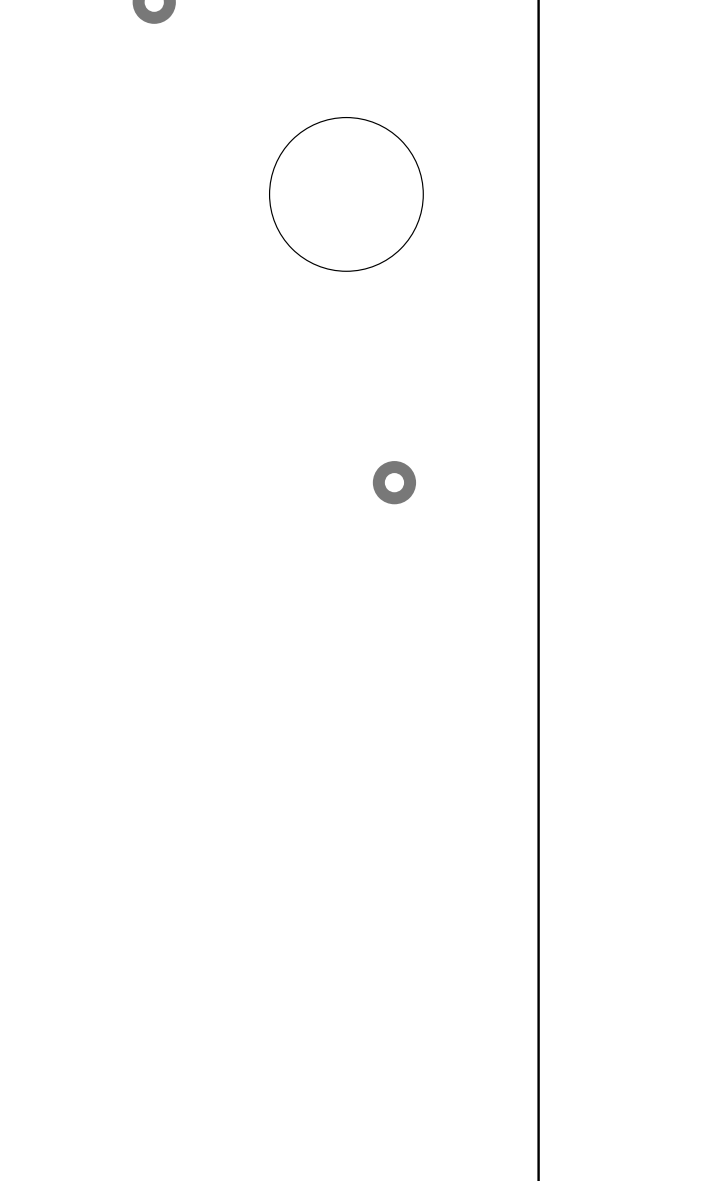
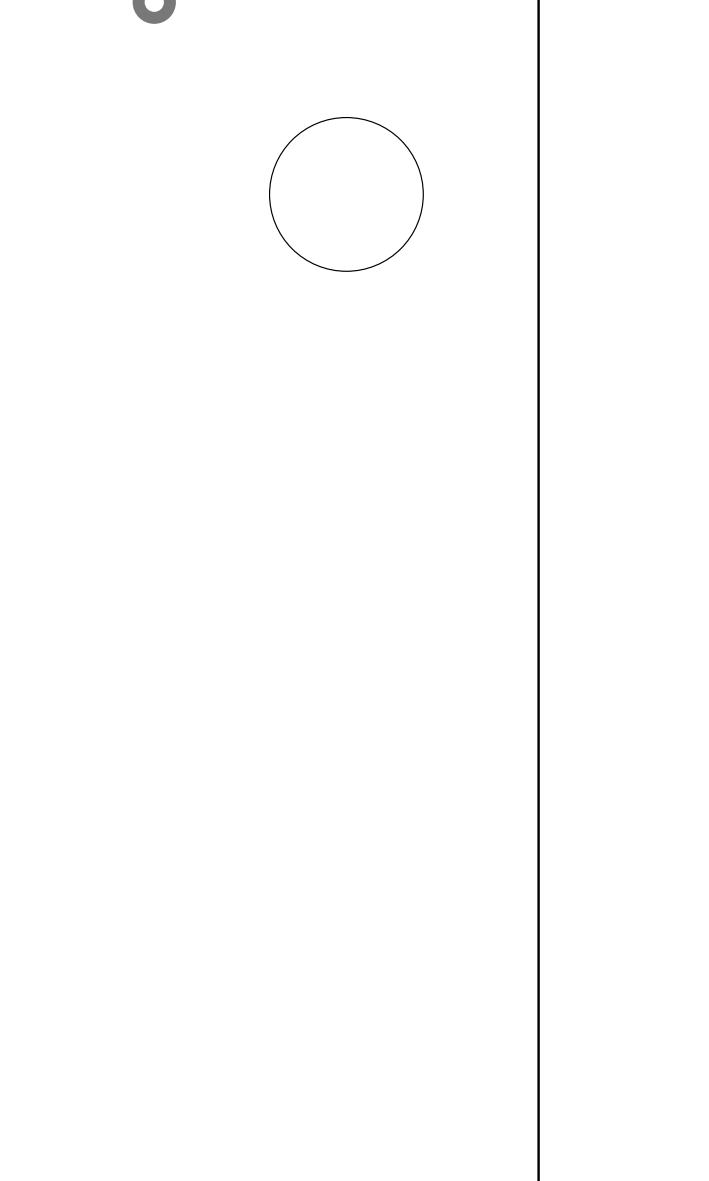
via: (394, 482) -> none

